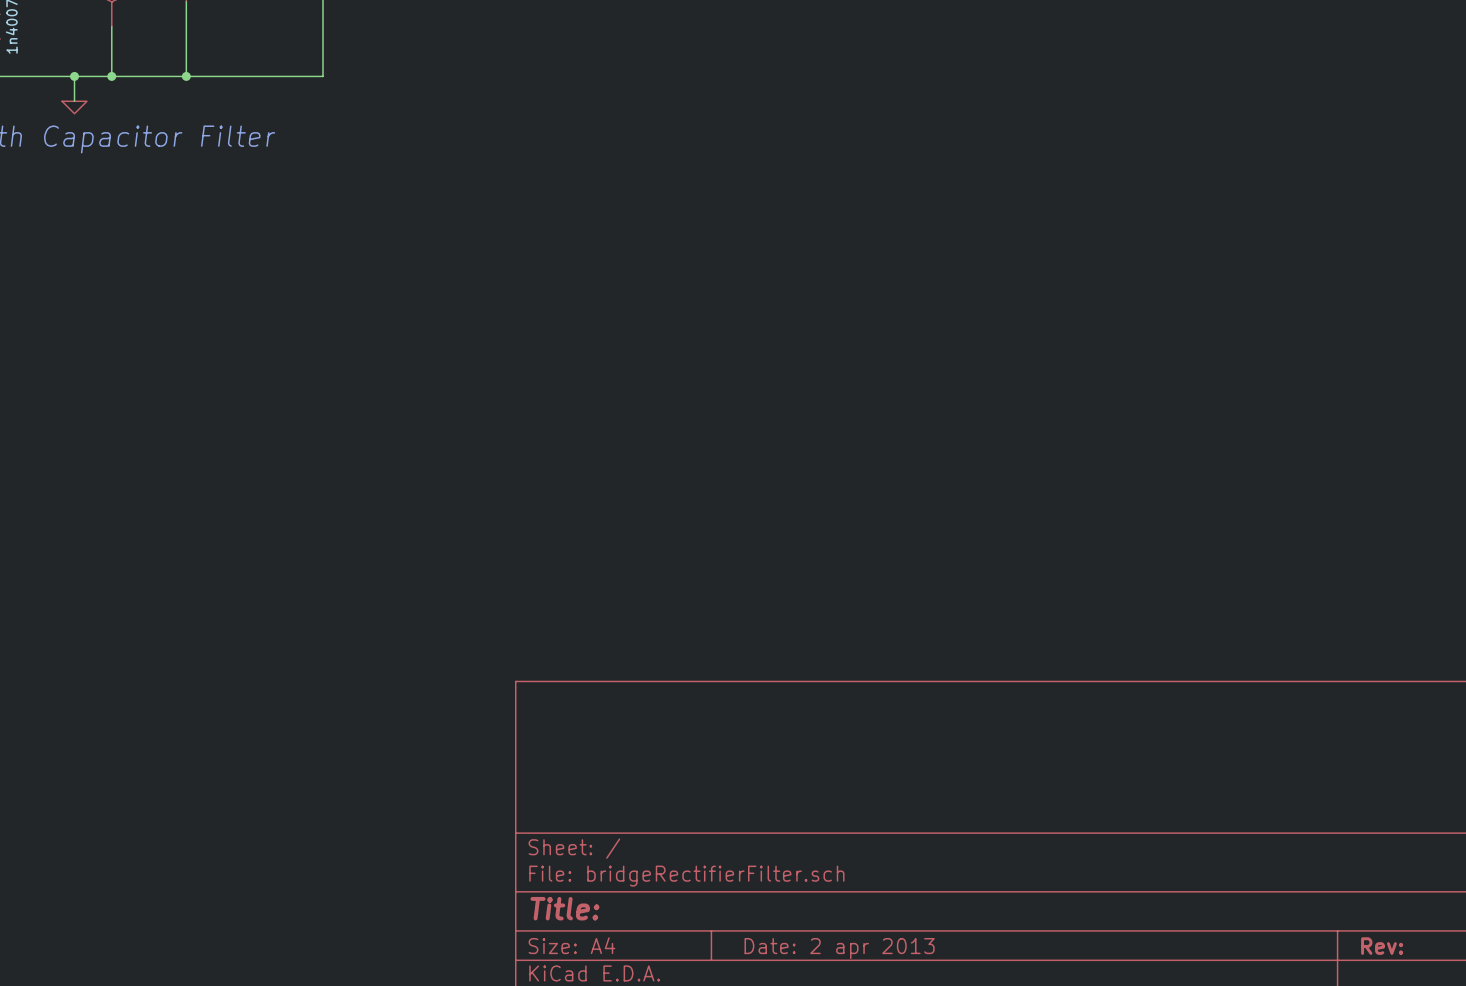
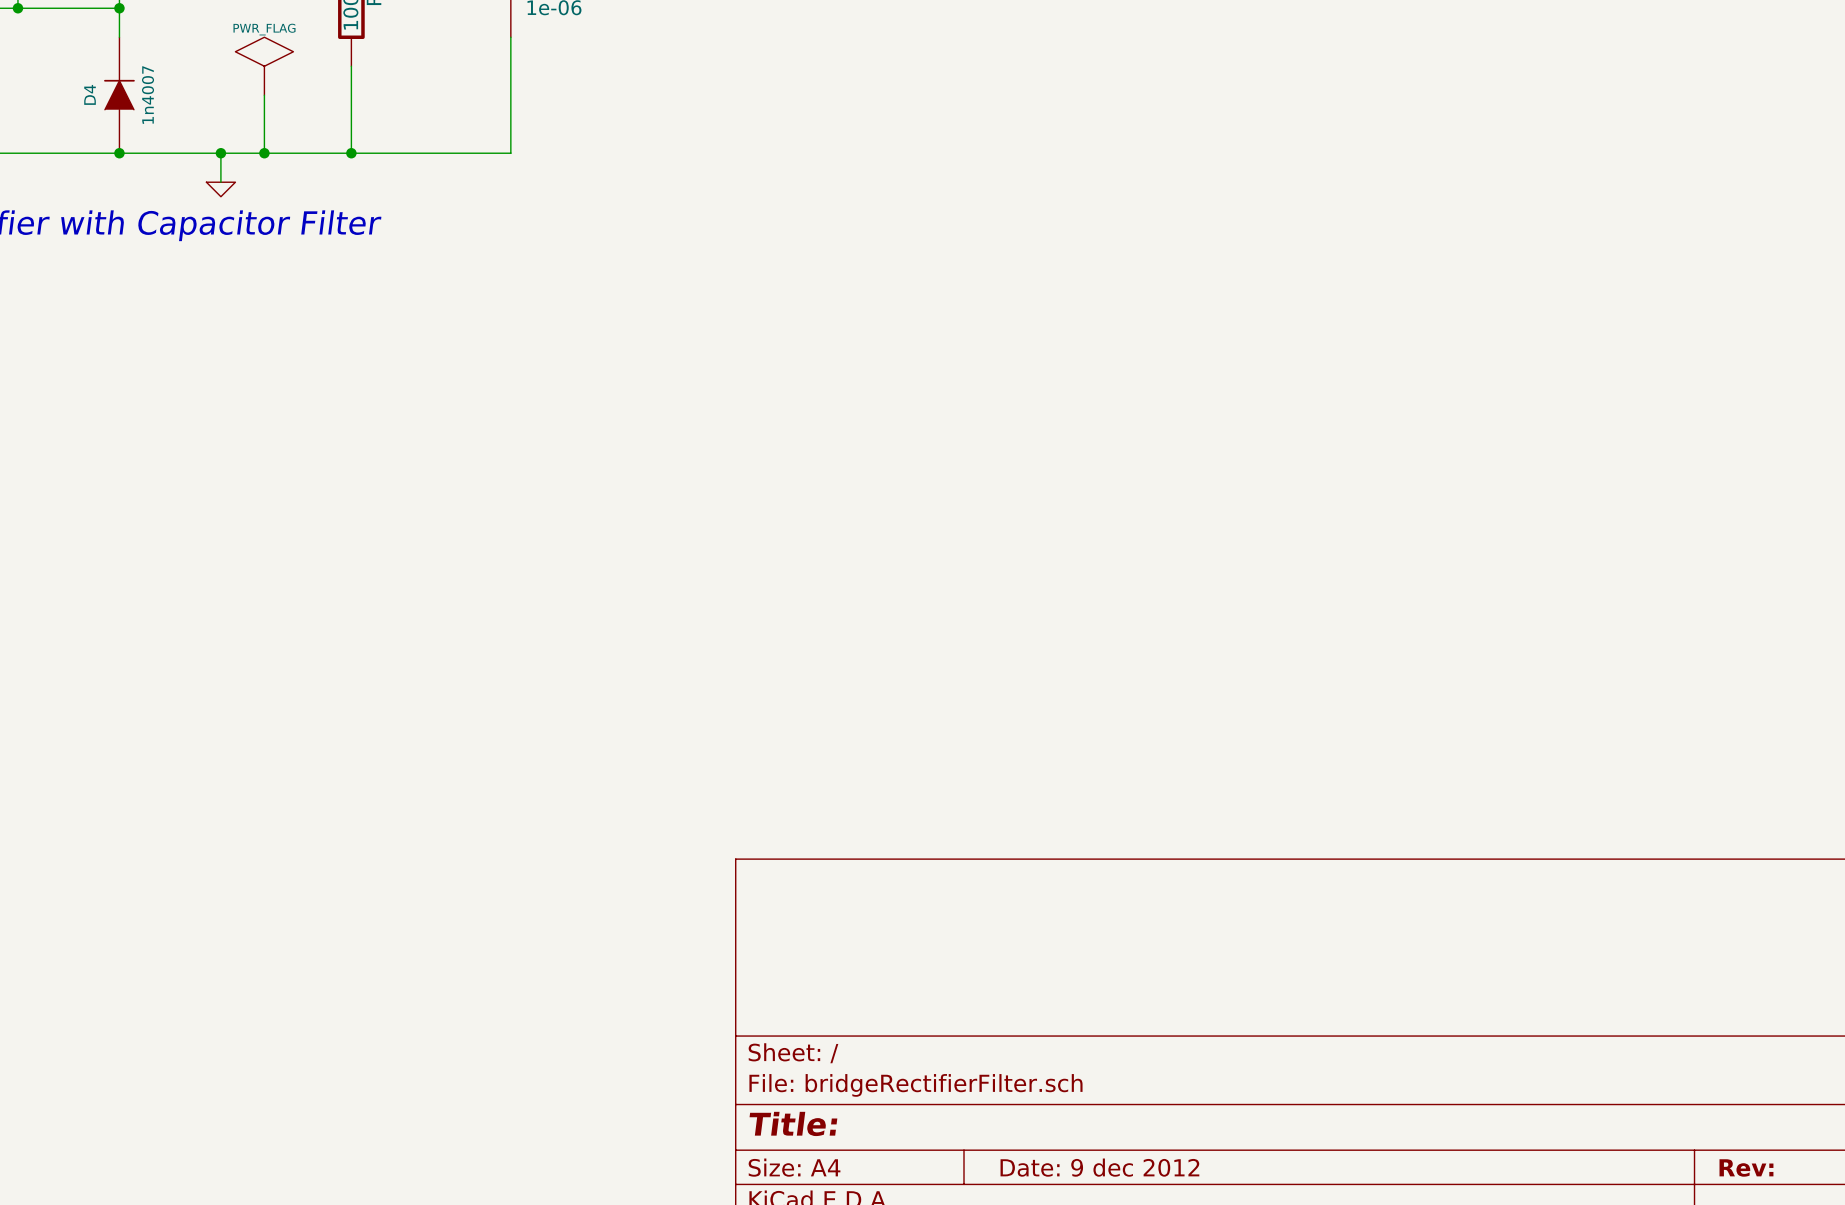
title block: Date: 2 apr 2013 (839, 948) -> Date: 9 dec 2012 (1099, 1167)

